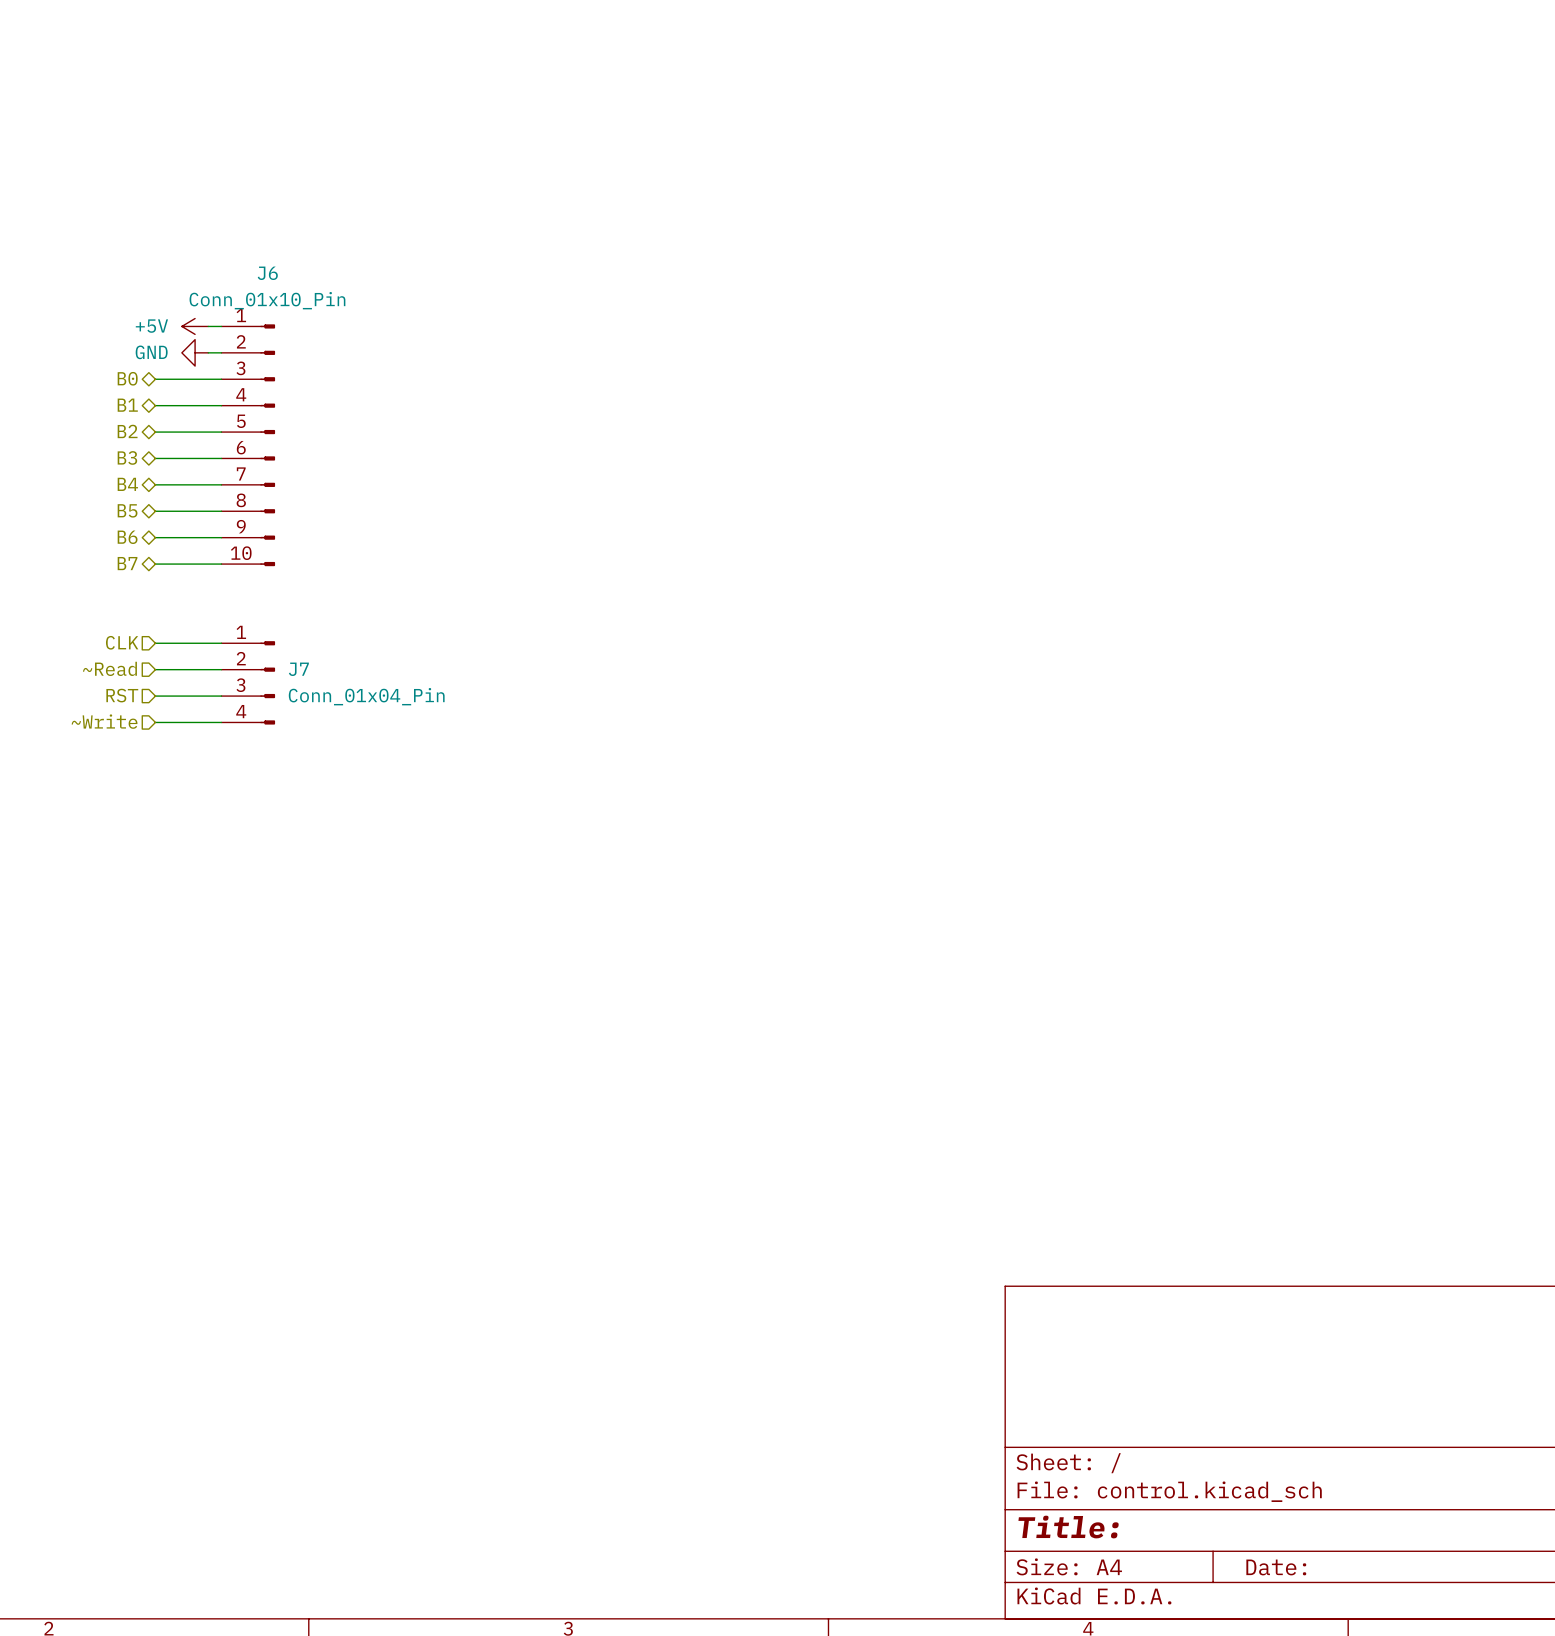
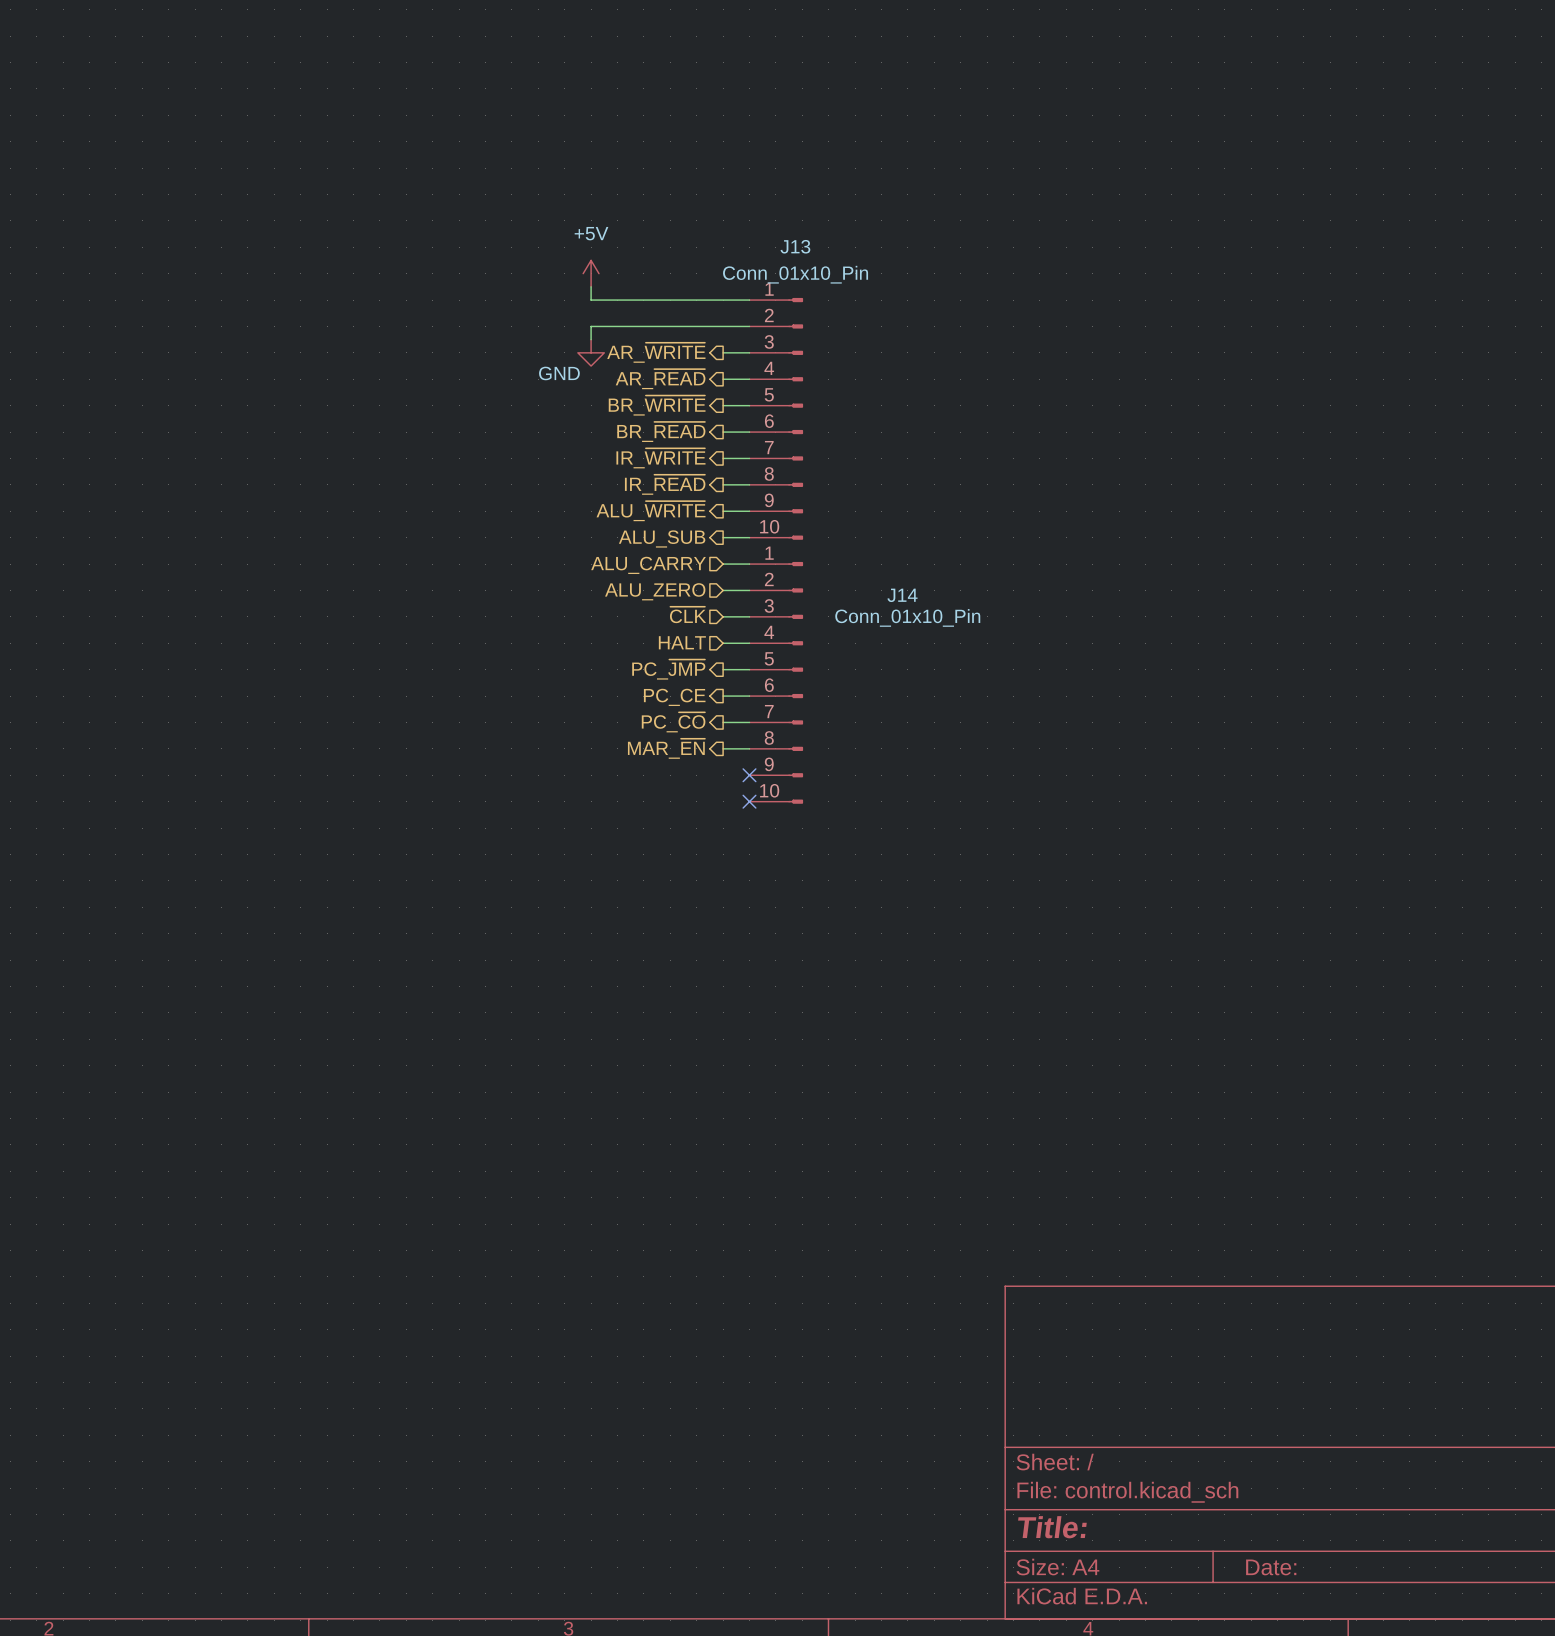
power symbol: none -> +5V (591, 273)
wire: none -> (591, 286) (591, 300) (749, 300)
power symbol: +5V (195, 326) -> none
wire: (208, 326) (221, 326) -> none
wire: none -> (749, 326) (591, 326) (591, 339)
power symbol: GND (195, 352) -> none
wire: (208, 352) (221, 352) -> none
power symbol: none -> GND (591, 352)
hierarchical label: none -> AR_~{WRITE} (656, 352)
wire: none -> (723, 352) (749, 352)
hierarchical label: B0 (127, 378) -> none
hierarchical label: none -> AR_~{READ} (660, 379)
wire: (155, 379) (221, 379) -> none
wire: none -> (723, 379) (749, 379)
hierarchical label: B1 (127, 405) -> none
wire: (155, 405) (221, 405) -> none
hierarchical label: none -> BR_~{WRITE} (657, 405)
wire: none -> (723, 405) (749, 405)
J13: none -> Conn_01x10_Pin (776, 418)
hierarchical label: B2 (127, 431) -> none
hierarchical label: none -> BR_~{READ} (661, 431)
wire: (155, 432) (221, 432) -> none
wire: none -> (723, 432) (749, 432)
J6: Conn_01x10_Pin (248, 445) -> none
hierarchical label: B3 (127, 457) -> none
wire: (155, 458) (221, 458) -> none
hierarchical label: none -> IR_~{WRITE} (660, 458)
wire: none -> (723, 458) (749, 458)
hierarchical label: B4 (127, 484) -> none
wire: (155, 484) (221, 484) -> none
hierarchical label: none -> IR_~{READ} (665, 484)
wire: none -> (723, 484) (749, 484)
hierarchical label: B5 (127, 510) -> none
hierarchical label: none -> ALU_~{WRITE} (651, 511)
wire: (155, 511) (221, 511) -> none
wire: none -> (723, 511) (749, 511)
hierarchical label: B6 (127, 537) -> none
wire: (155, 537) (221, 537) -> none
wire: none -> (723, 537) (749, 537)
hierarchical label: none -> ALU_SUB (662, 538)
hierarchical label: B7 (127, 563) -> none
wire: (155, 564) (221, 564) -> none
wire: none -> (723, 564) (749, 564)
hierarchical label: none -> ALU_CARRY (648, 565)
wire: none -> (723, 590) (749, 590)
hierarchical label: none -> ALU_ZERO (655, 591)
hierarchical label: none -> ~{CLK} (688, 614)
wire: none -> (723, 616) (749, 616)
hierarchical label: CLK (122, 642) -> none
hierarchical label: none -> HALT (682, 642)
wire: (155, 643) (221, 643) -> none
wire: none -> (723, 643) (749, 643)
hierarchical label: ~Read (109, 668) -> none
wire: (155, 669) (221, 669) -> none
hierarchical label: none -> PC_~{JMP} (668, 669)
wire: none -> (723, 669) (749, 669)
J7: Conn_01x04_Pin (248, 682) -> none
J14: none -> Conn_01x10_Pin (776, 682)
hierarchical label: RST (122, 695) -> none
wire: (155, 696) (221, 696) -> none
wire: none -> (723, 696) (749, 696)
hierarchical label: none -> PC_CE (674, 697)
hierarchical label: ~Write (104, 721) -> none
wire: (155, 722) (221, 722) -> none
hierarchical label: none -> PC_~{CO} (673, 722)
wire: none -> (723, 722) (749, 722)
hierarchical label: none -> MAR_~{EN} (666, 748)
wire: none -> (723, 748) (749, 748)
no-connect mark: none -> (749, 775)
no-connect mark: none -> (749, 801)

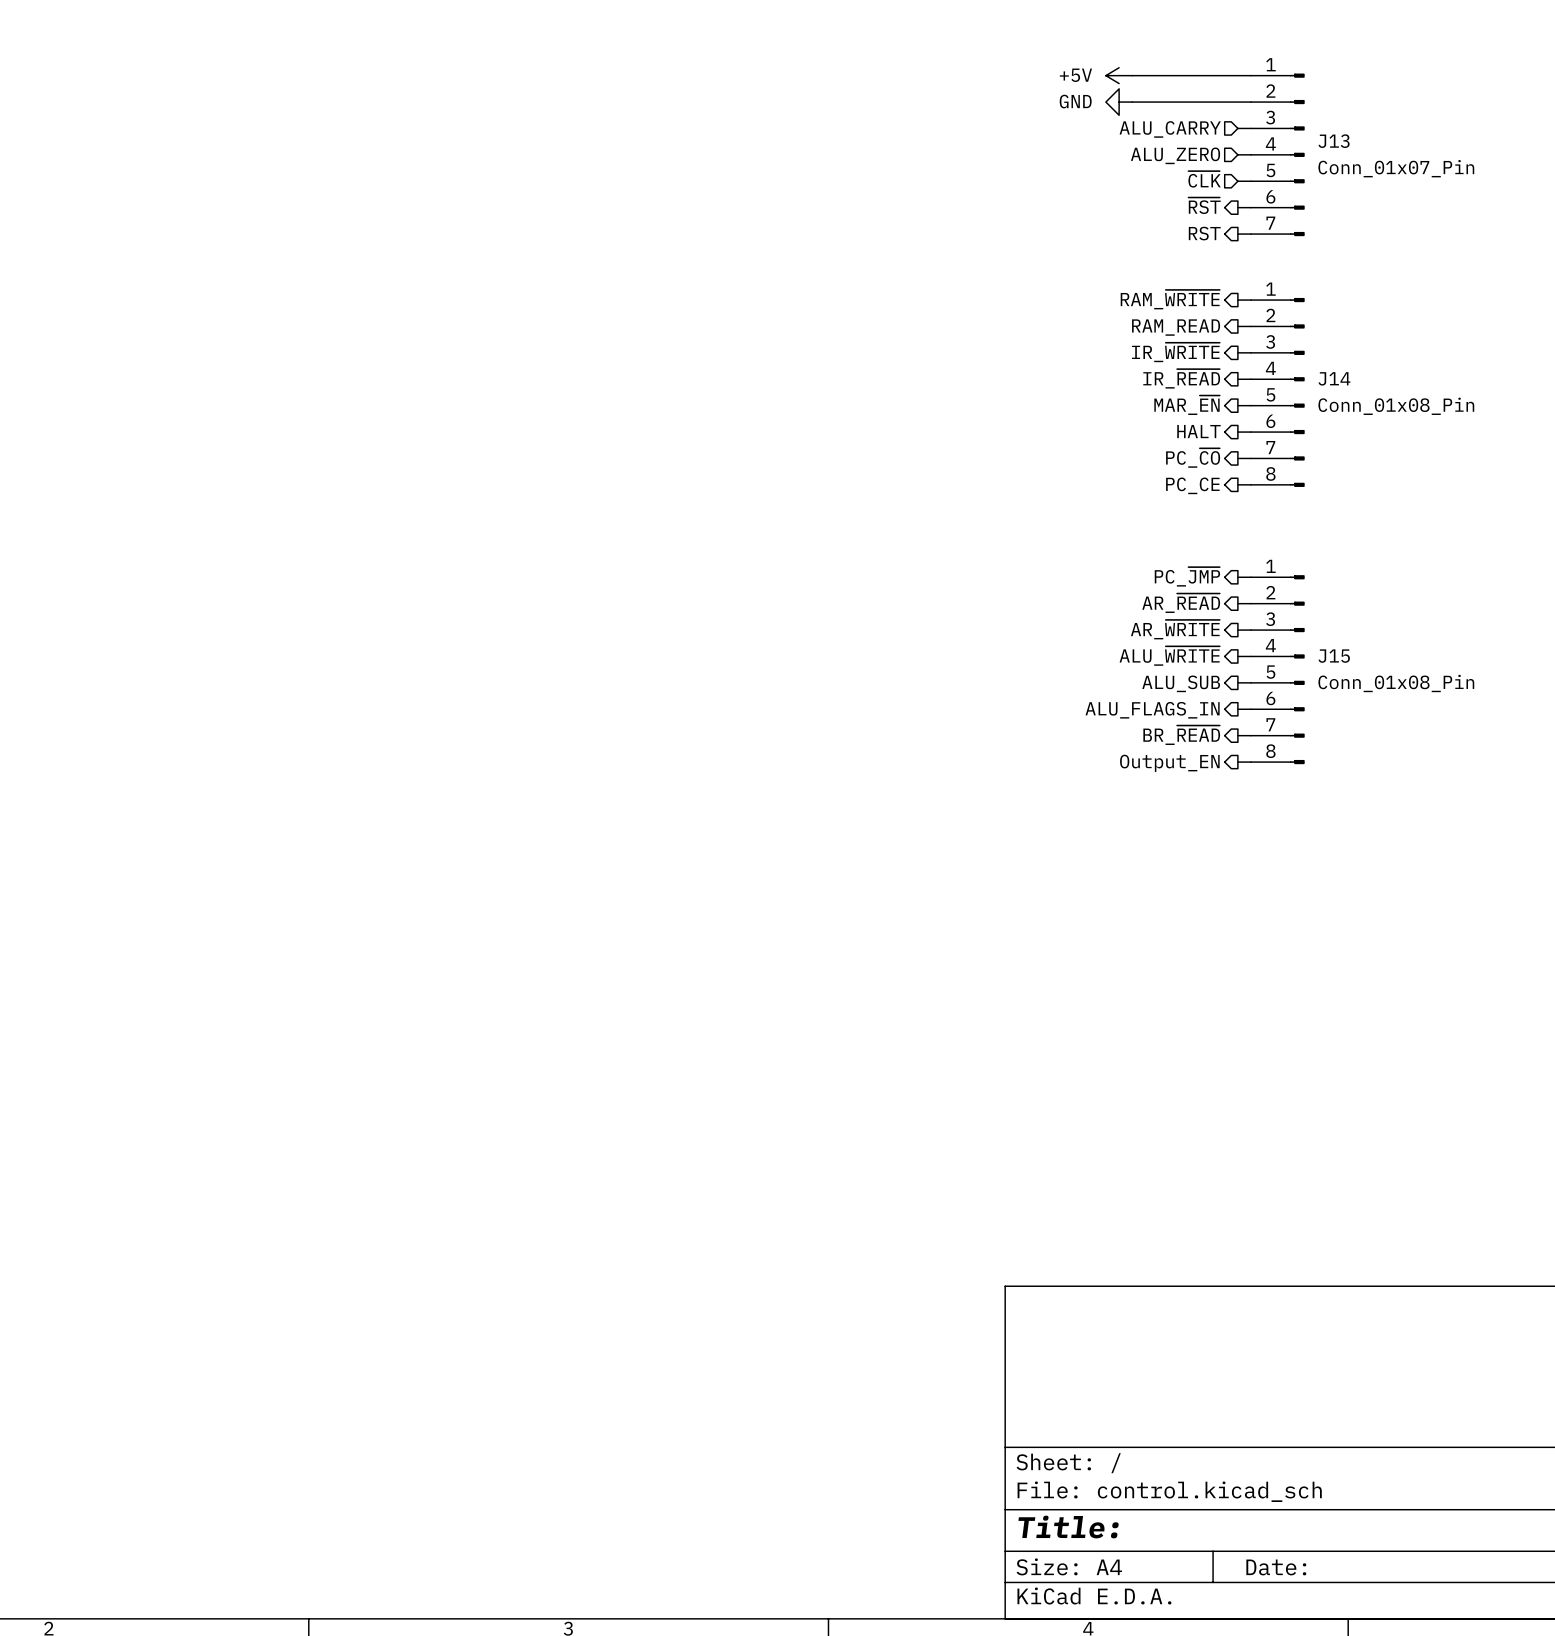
power symbol: none -> +5V (1119, 75)
wire: none -> (1132, 75) (1251, 75)
power symbol: none -> GND (1119, 102)
wire: none -> (1132, 102) (1251, 102)
wire: none -> (1237, 128) (1251, 128)
hierarchical label: none -> ALU_CARRY (1170, 129)
wire: none -> (1237, 154) (1251, 154)
hierarchical label: none -> ALU_ZERO (1175, 155)
hierarchical label: none -> ~{CLK} (1204, 179)
wire: none -> (1237, 181) (1251, 181)
hierarchical label: none -> ~{RST} (1204, 205)
wire: none -> (1237, 207) (1251, 207)
hierarchical label: none -> RST (1204, 233)
wire: none -> (1237, 234) (1251, 234)
J13 name position: J13 (795, 246) -> J13 (1334, 141)
power symbol: +5V (591, 273) -> none
J13 value: Conn_01x10_Pin (795, 274) -> Conn_01x07_Pin (1396, 168)
wire: (591, 286) (591, 300) (749, 300) -> none
J13 symbol: [749, 297, 804, 540] -> [1251, 73, 1305, 237]
hierarchical label: none -> RAM_~{WRITE} (1170, 299)
wire: none -> (1237, 300) (1251, 300)
wire: (749, 326) (591, 326) (591, 339) -> none
wire: none -> (1237, 326) (1251, 326)
hierarchical label: none -> RAM_READ (1176, 327)
power symbol: GND (591, 352) -> none
hierarchical label: AR_~{WRITE} (656, 352) -> none
wire: (723, 352) (749, 352) -> none
hierarchical label: none -> IR_~{WRITE} (1175, 352)
wire: none -> (1237, 352) (1251, 352)
hierarchical label: AR_~{READ} (660, 379) -> none
wire: (723, 379) (749, 379) -> none
hierarchical label: none -> IR_~{READ} (1181, 378)
wire: none -> (1237, 379) (1251, 379)
hierarchical label: BR_~{WRITE} (657, 405) -> none
wire: (723, 405) (749, 405) -> none
hierarchical label: none -> MAR_~{EN} (1187, 405)
wire: none -> (1237, 405) (1251, 405)
hierarchical label: BR_~{READ} (661, 431) -> none
hierarchical label: none -> HALT (1198, 431)
wire: (723, 432) (749, 432) -> none
wire: none -> (1237, 432) (1251, 432)
hierarchical label: IR_~{WRITE} (660, 458) -> none
wire: (723, 458) (749, 458) -> none
hierarchical label: none -> PC_~{CO} (1193, 458)
wire: none -> (1237, 458) (1251, 458)
hierarchical label: IR_~{READ} (665, 484) -> none
wire: (723, 484) (749, 484) -> none
wire: none -> (1237, 484) (1251, 484)
hierarchical label: none -> PC_CE (1192, 485)
hierarchical label: ALU_~{WRITE} (651, 511) -> none
wire: (723, 511) (749, 511) -> none
wire: (723, 537) (749, 537) -> none
hierarchical label: ALU_SUB (662, 538) -> none
J14 symbol: [749, 561, 804, 804] -> [1251, 297, 1305, 487]
wire: (723, 564) (749, 564) -> none
hierarchical label: ALU_CARRY (648, 565) -> none
hierarchical label: none -> PC_~{JMP} (1187, 576)
wire: none -> (1237, 577) (1251, 577)
wire: (723, 590) (749, 590) -> none
hierarchical label: ALU_ZERO (655, 591) -> none
J14 name position: J14 (902, 595) -> J14 (1334, 378)
hierarchical label: none -> AR_~{READ} (1181, 603)
wire: none -> (1237, 603) (1251, 603)
hierarchical label: ~{CLK} (688, 614) -> none
wire: (723, 616) (749, 616) -> none
J14 value: Conn_01x10_Pin (907, 617) -> Conn_01x08_Pin (1396, 406)
hierarchical label: none -> AR_~{WRITE} (1175, 629)
wire: none -> (1237, 630) (1251, 630)
hierarchical label: HALT (682, 642) -> none
wire: (723, 643) (749, 643) -> none
hierarchical label: none -> ALU_~{WRITE} (1169, 656)
wire: none -> (1237, 656) (1251, 656)
hierarchical label: PC_~{JMP} (668, 669) -> none
wire: (723, 669) (749, 669) -> none
J15: none -> Conn_01x08_Pin (1277, 669)
wire: none -> (1237, 682) (1251, 682)
hierarchical label: none -> ALU_SUB (1181, 683)
wire: (723, 696) (749, 696) -> none
hierarchical label: PC_CE (674, 697) -> none
wire: none -> (1237, 709) (1251, 709)
hierarchical label: none -> ALU_FLAGS_IN (1152, 710)
hierarchical label: PC_~{CO} (673, 722) -> none
wire: (723, 722) (749, 722) -> none
hierarchical label: none -> BR_~{READ} (1181, 735)
wire: none -> (1237, 735) (1251, 735)
hierarchical label: MAR_~{EN} (666, 748) -> none
wire: (723, 748) (749, 748) -> none
wire: none -> (1237, 762) (1251, 762)
hierarchical label: none -> Output_EN (1169, 763)
no-connect mark: (749, 775) -> none
no-connect mark: (749, 801) -> none

